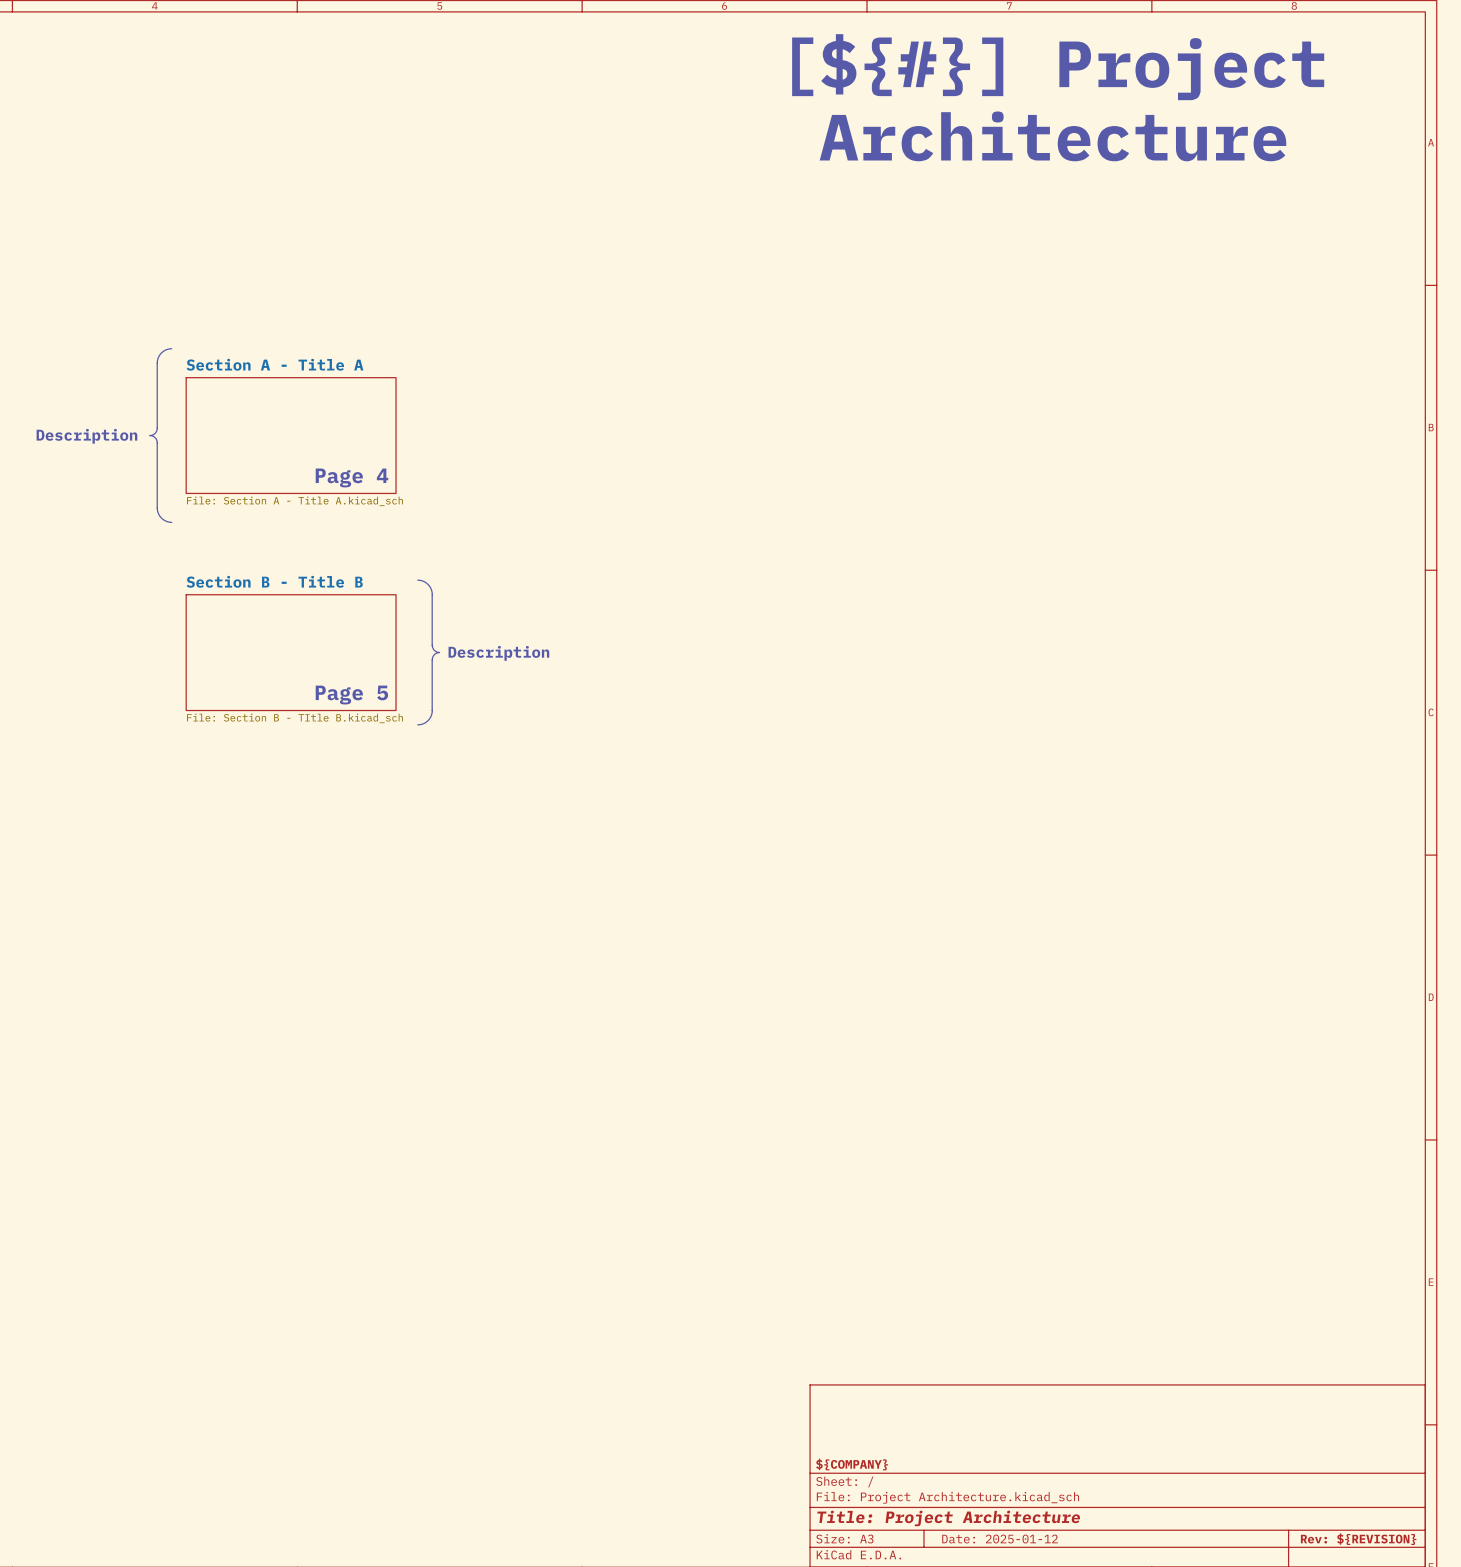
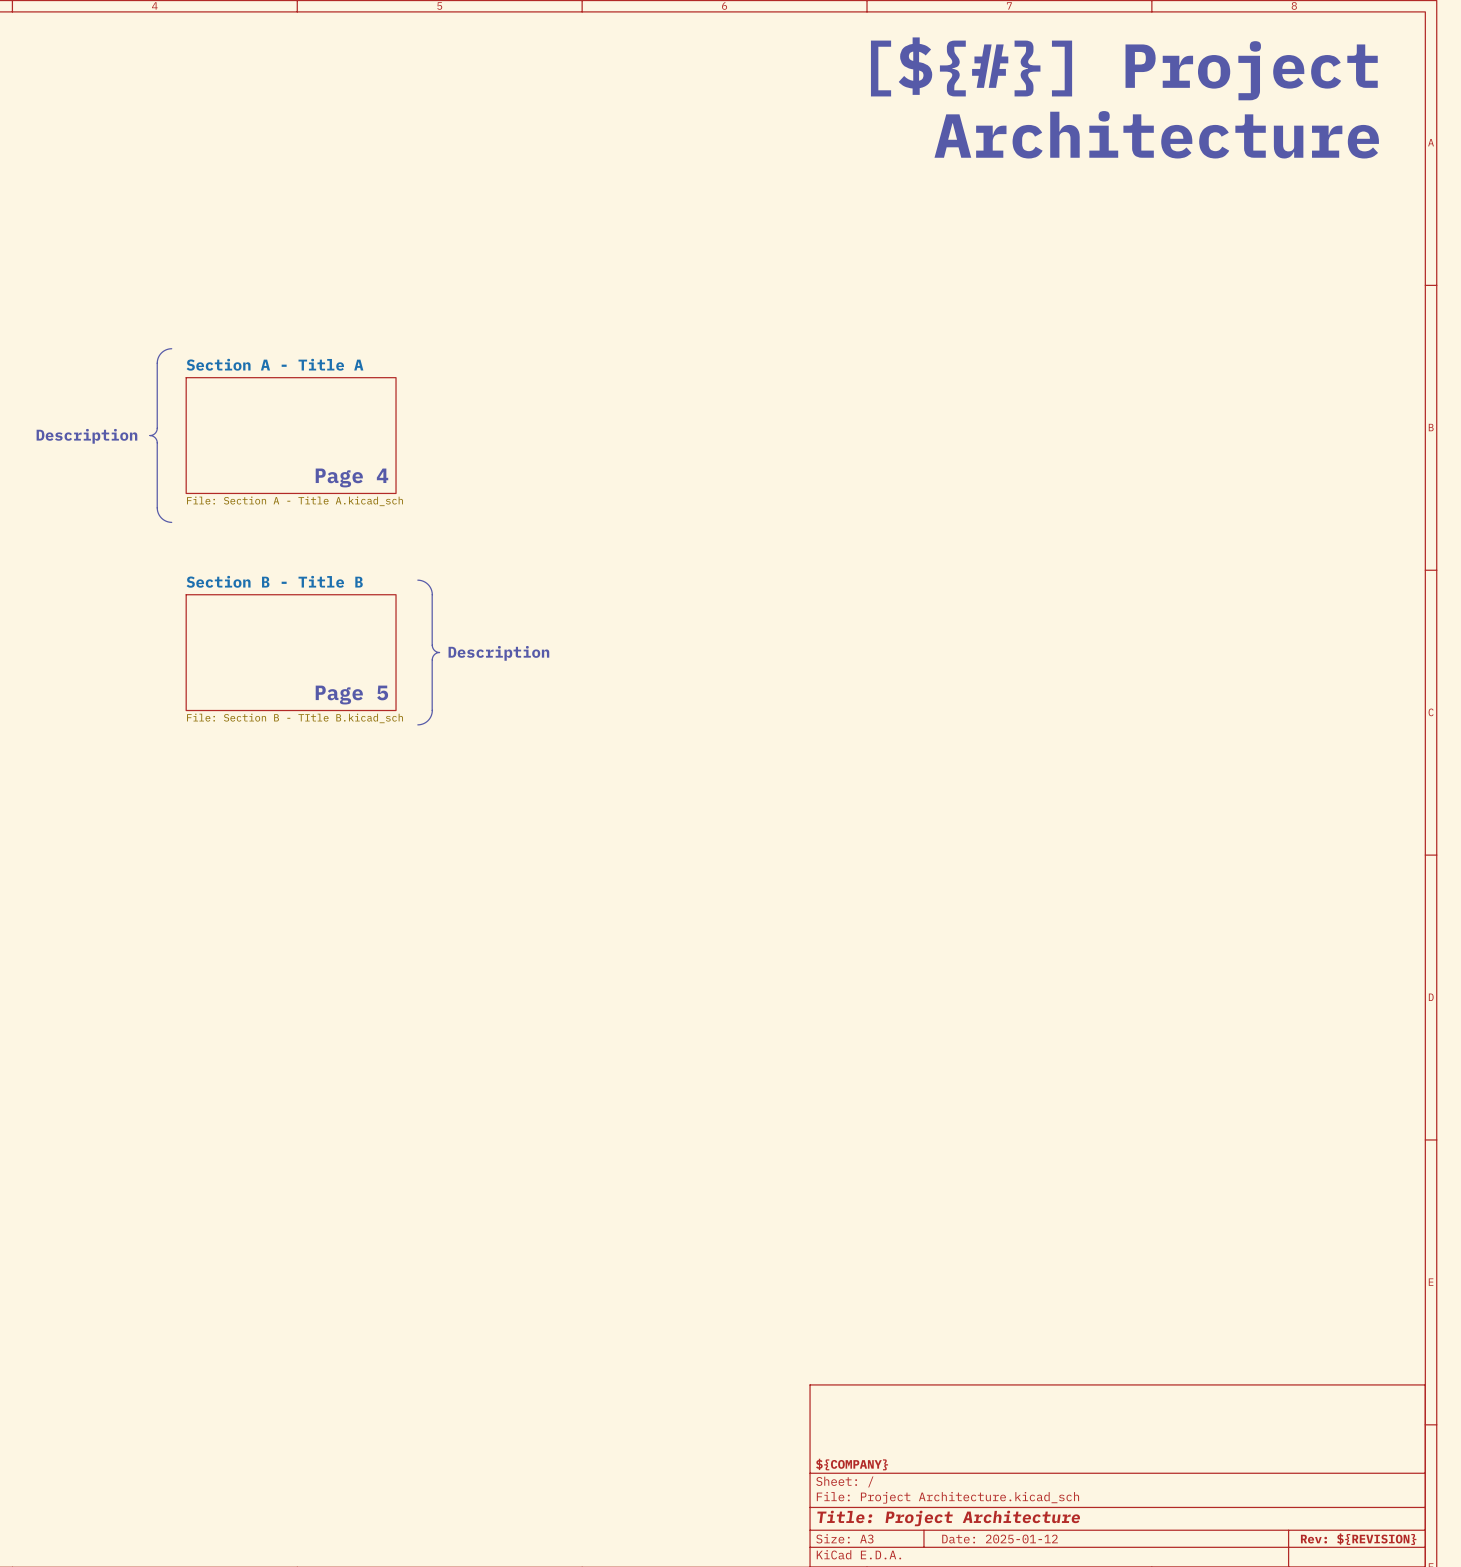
text: [${#}] Project (1058, 67) -> none
text: none -> [${#}] Project (1124, 68)
text: none -> Architecture (1156, 134)
text: Architecture (1052, 136) -> none

